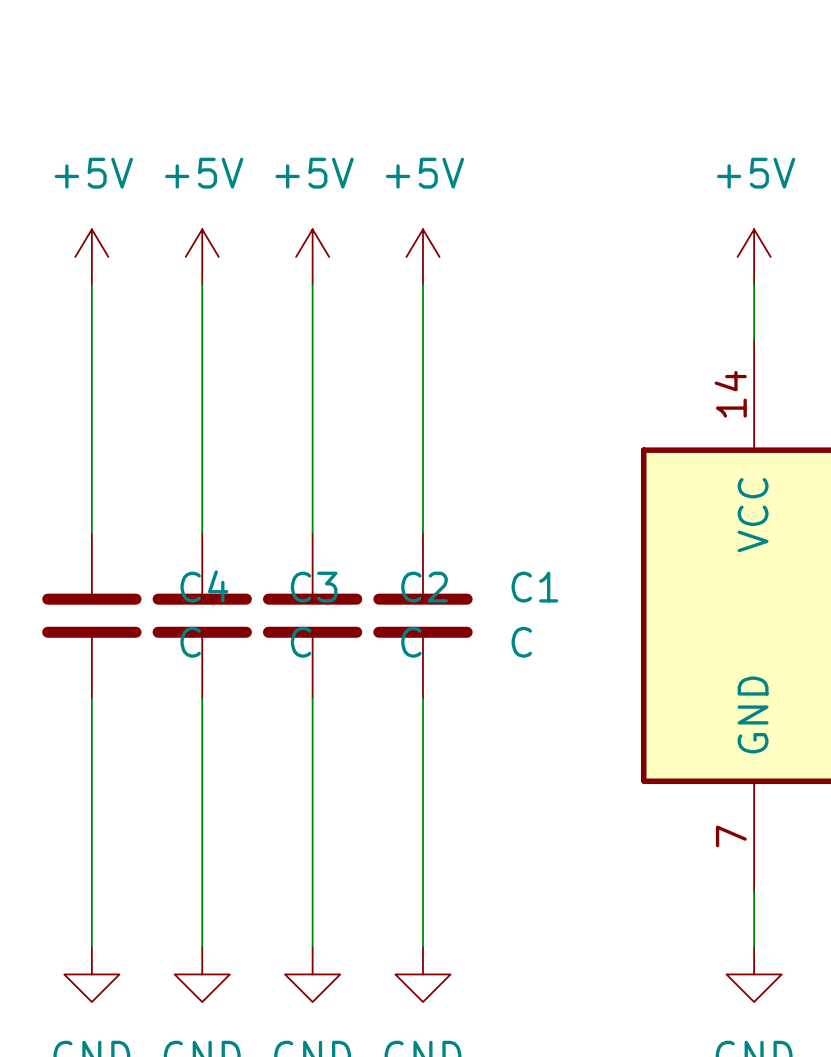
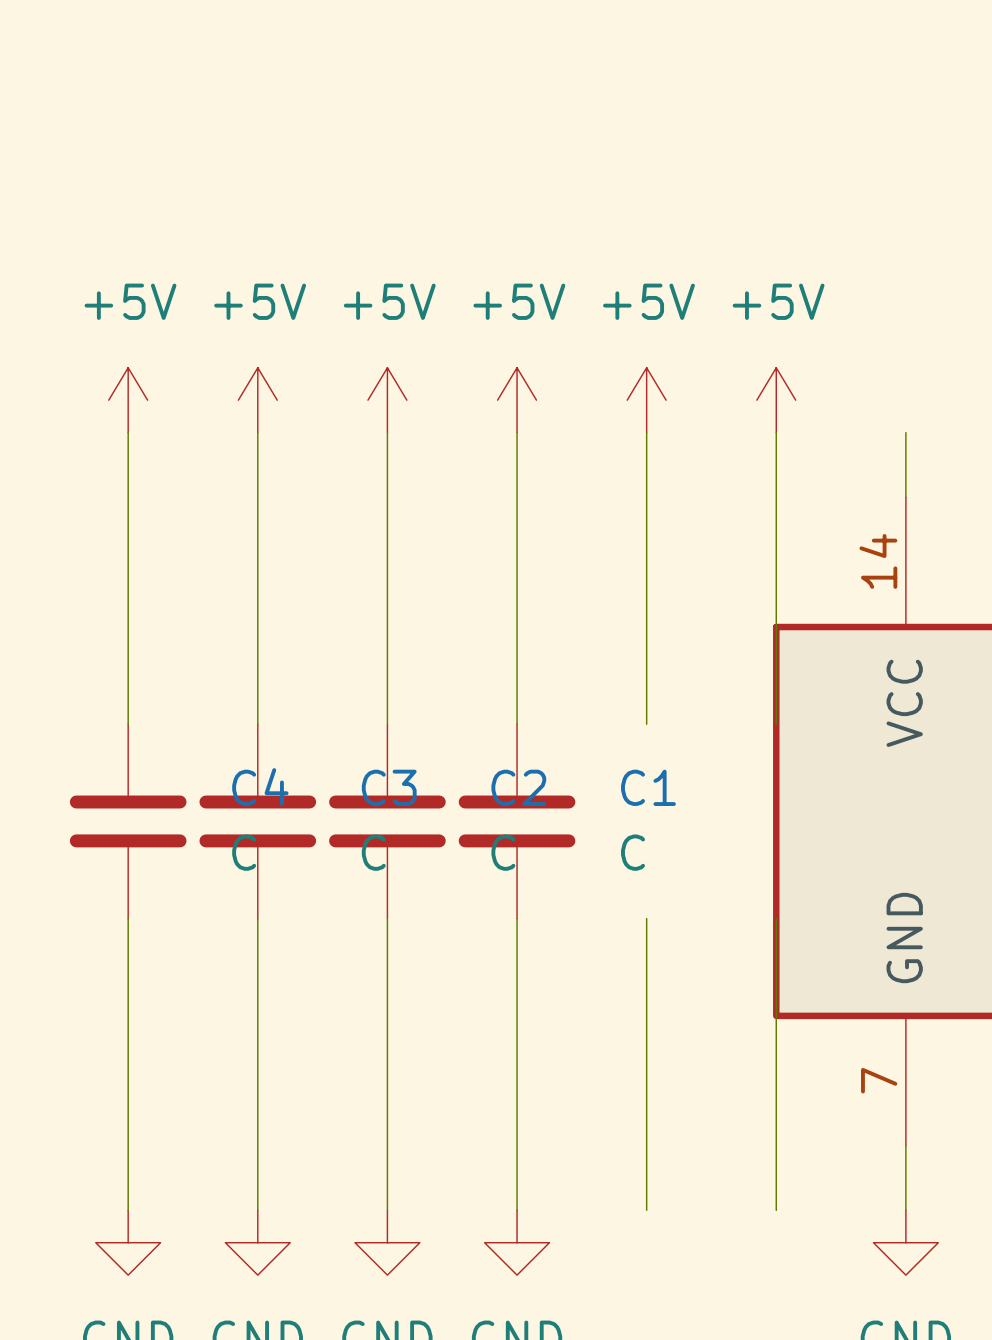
power symbol: none -> +5V (646, 400)
power symbol: none -> +5V (776, 400)
power symbol: +5V (754, 256) -> none
wire: none -> (646, 432) (646, 724)
wire: none -> (776, 432) (776, 724)
wire: none -> (646, 918) (646, 1210)
wire: none -> (776, 918) (776, 1210)

